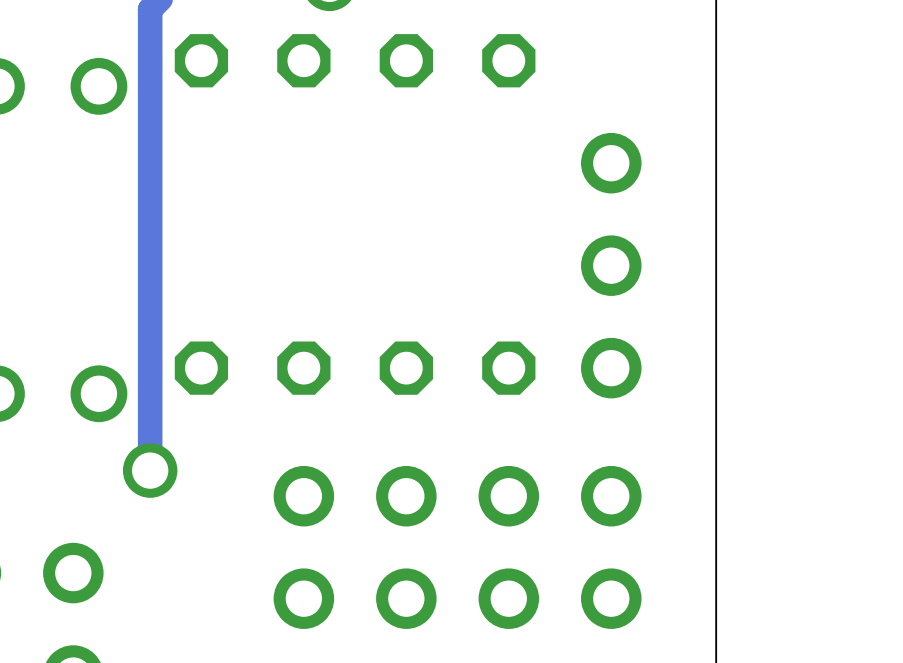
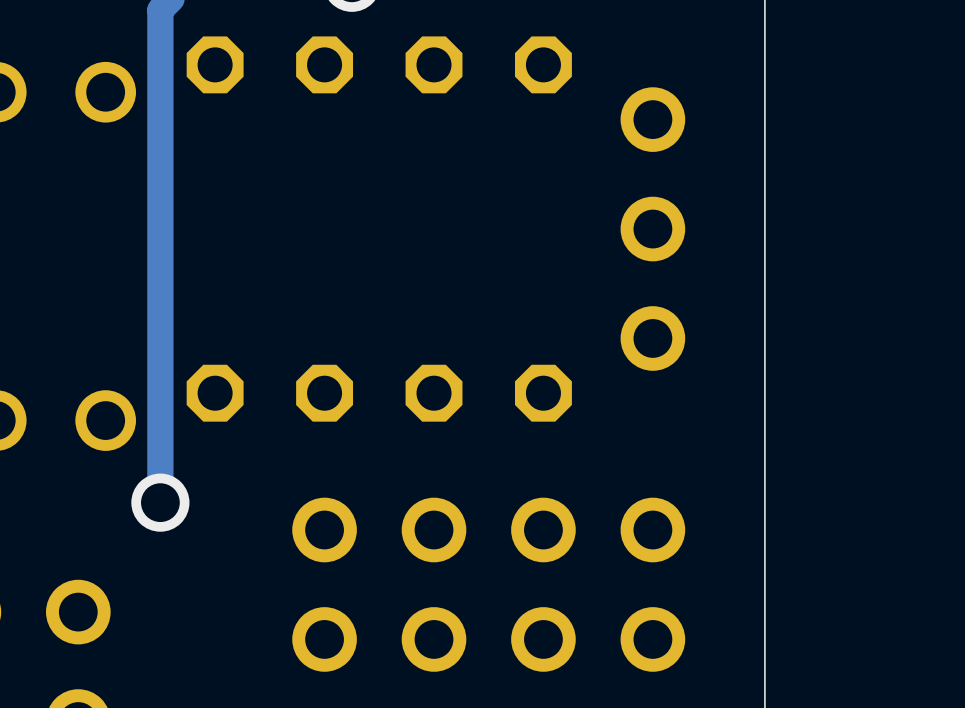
part position: (611, 214) -> (652, 174)
part position: (611, 368) -> (652, 338)

